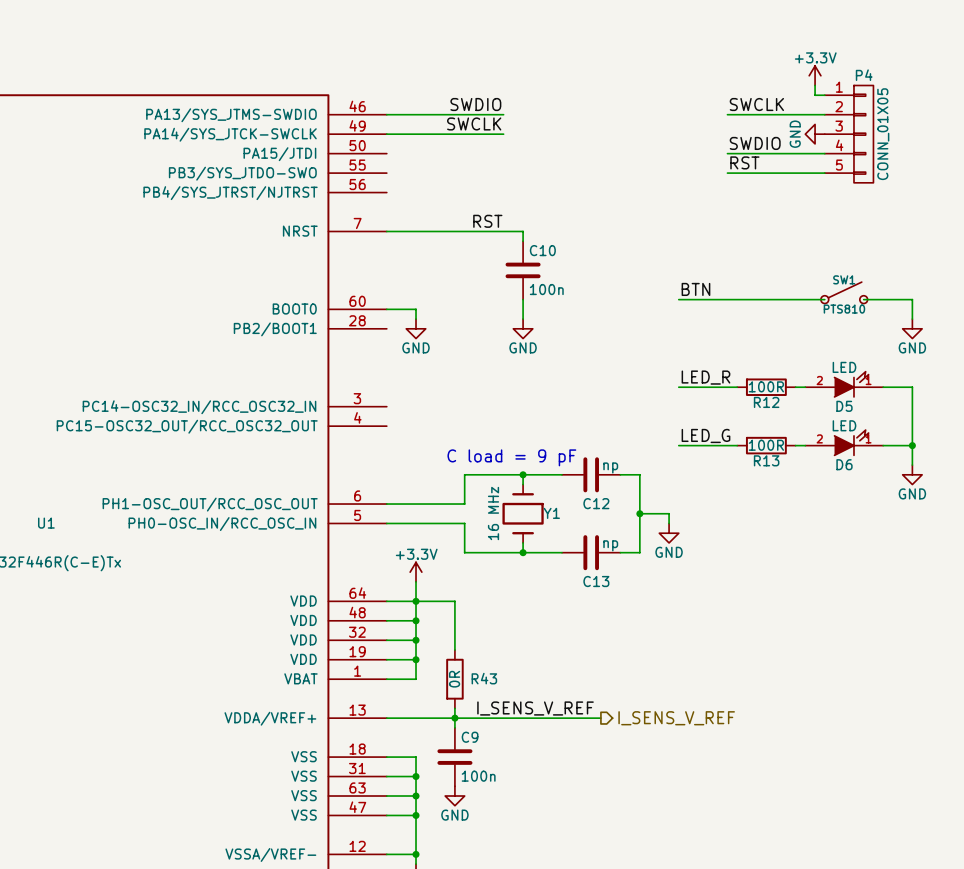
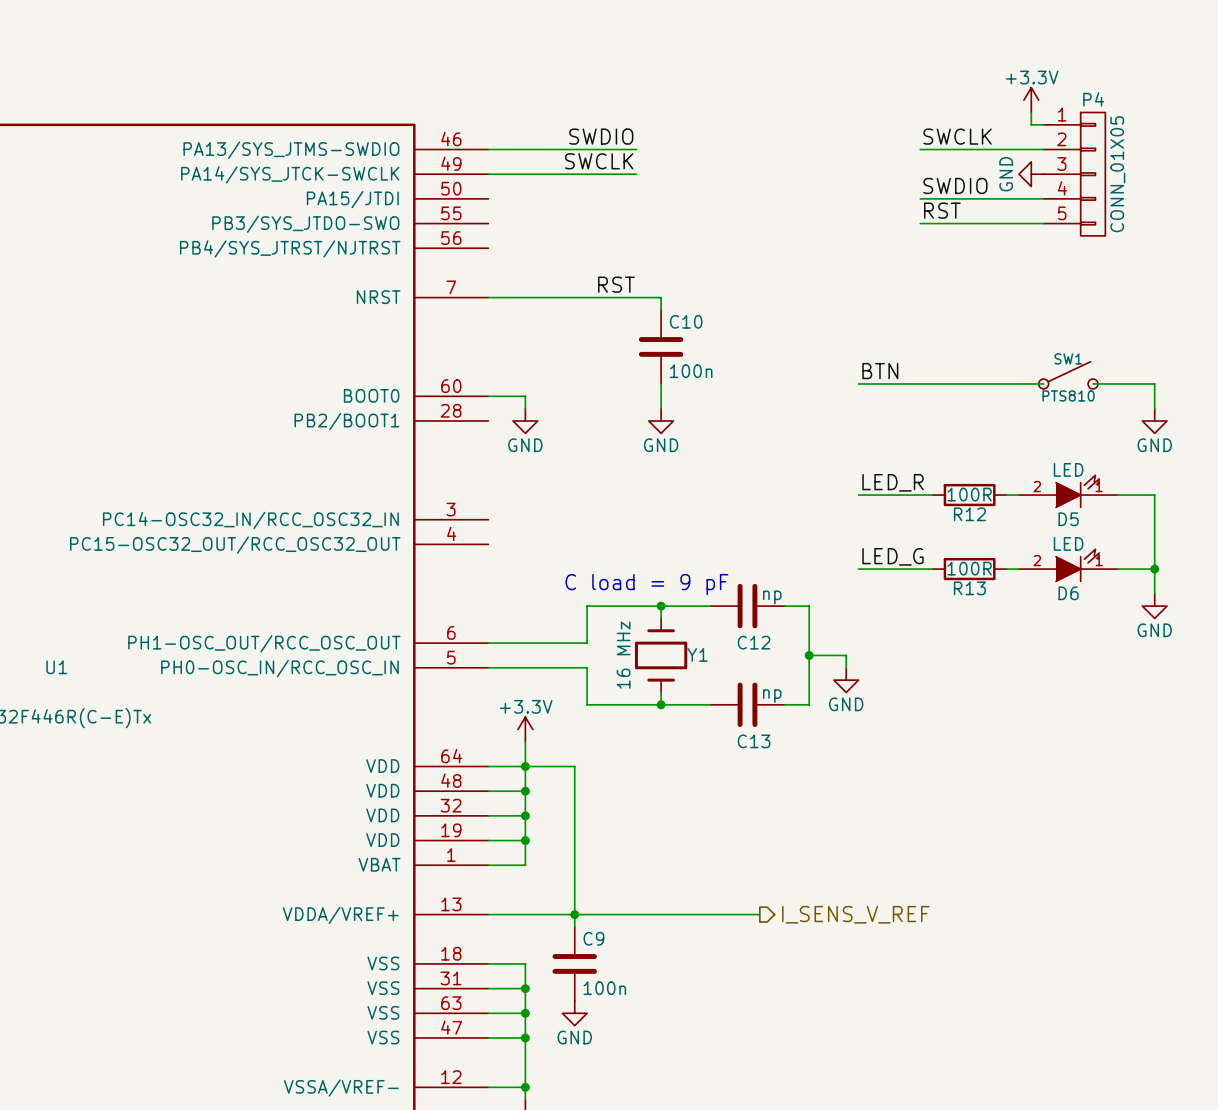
wire: none -> (574, 828) (574, 902)
R43: 0R (454, 679) -> none
label: I_SENS_V_REF (535, 708) -> none

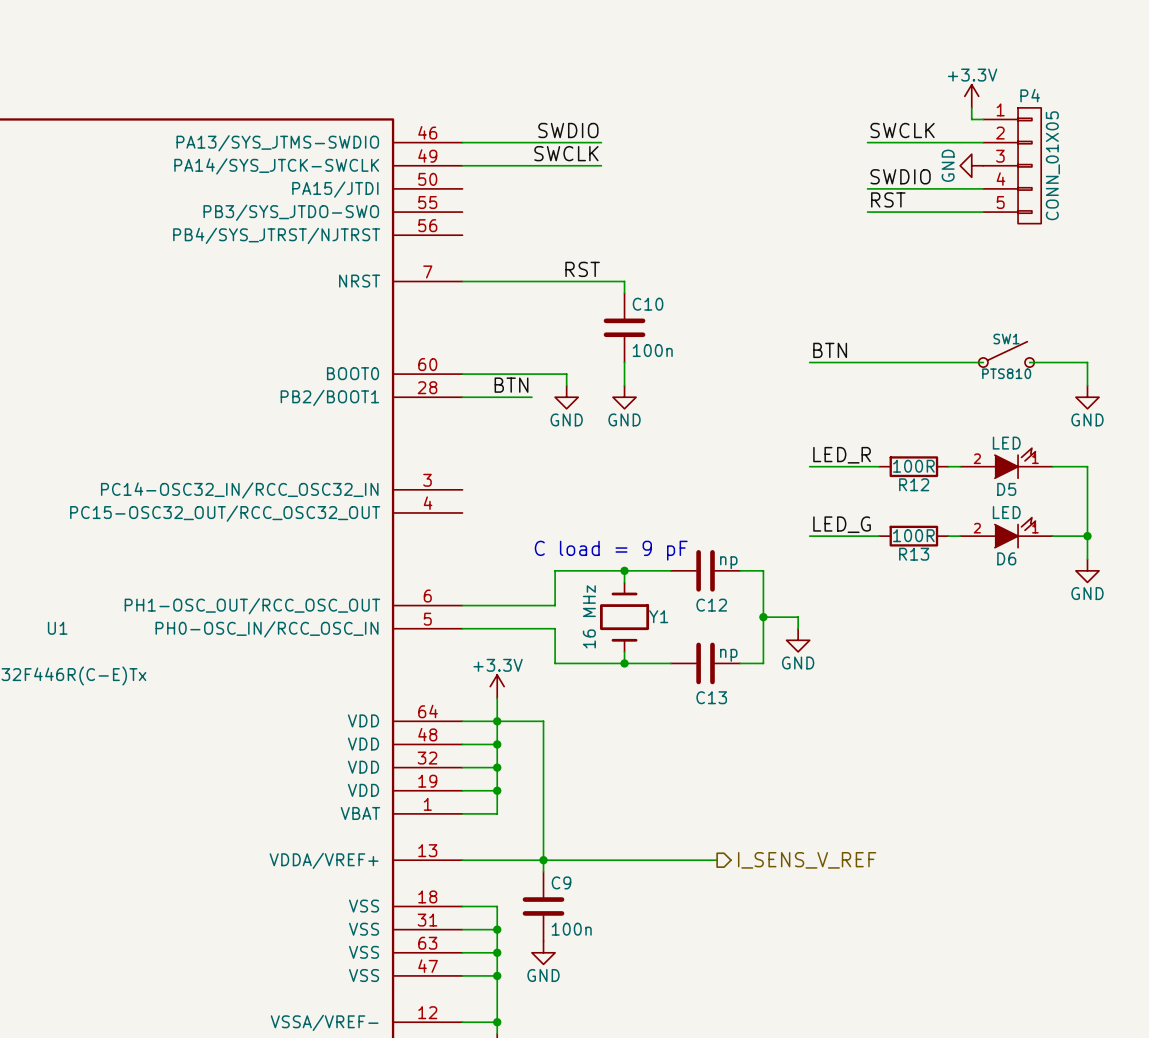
wire: (525, 396) (525, 408) -> (497, 374) (566, 374) (566, 385)
label: none -> BTN (511, 385)
wire: none -> (462, 397) (531, 397)
power symbol position: GND (525, 421) -> GND (566, 397)

